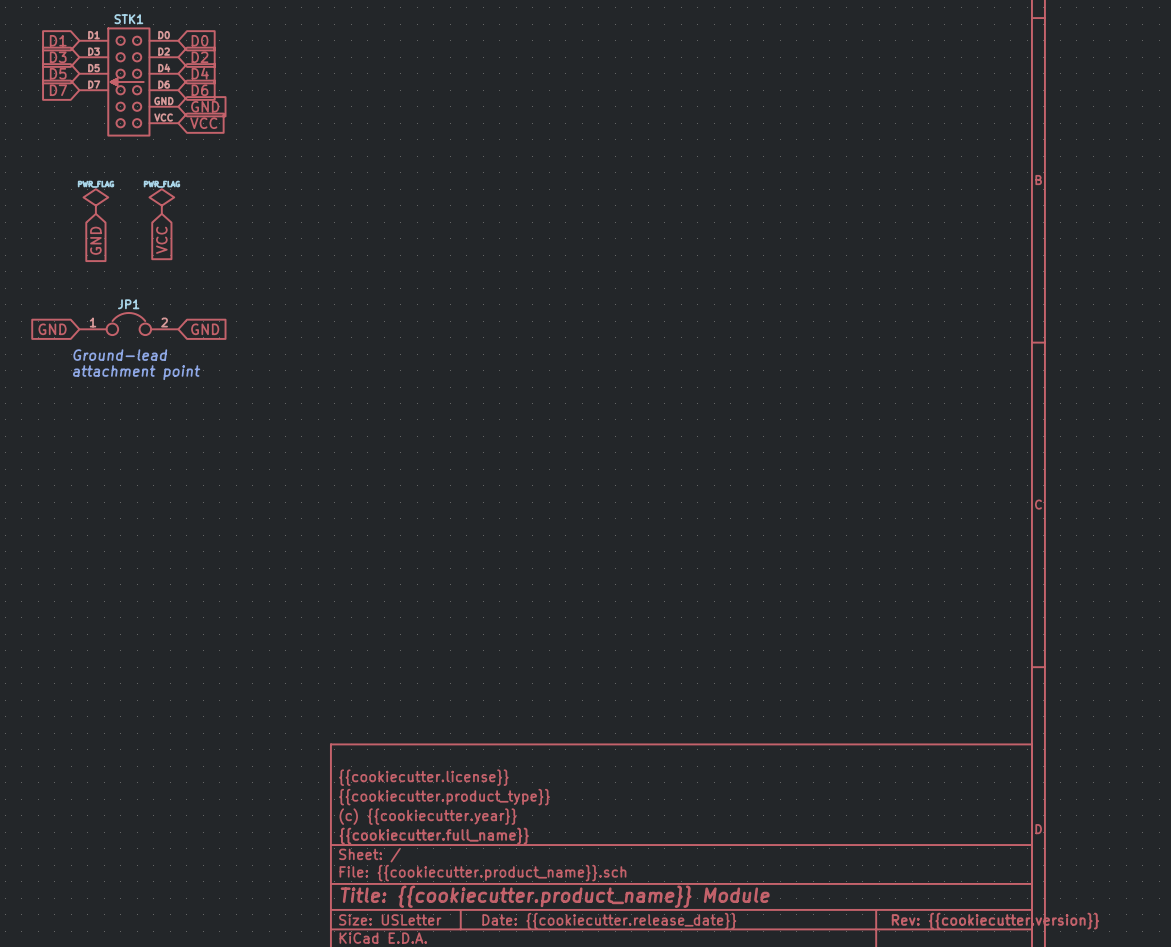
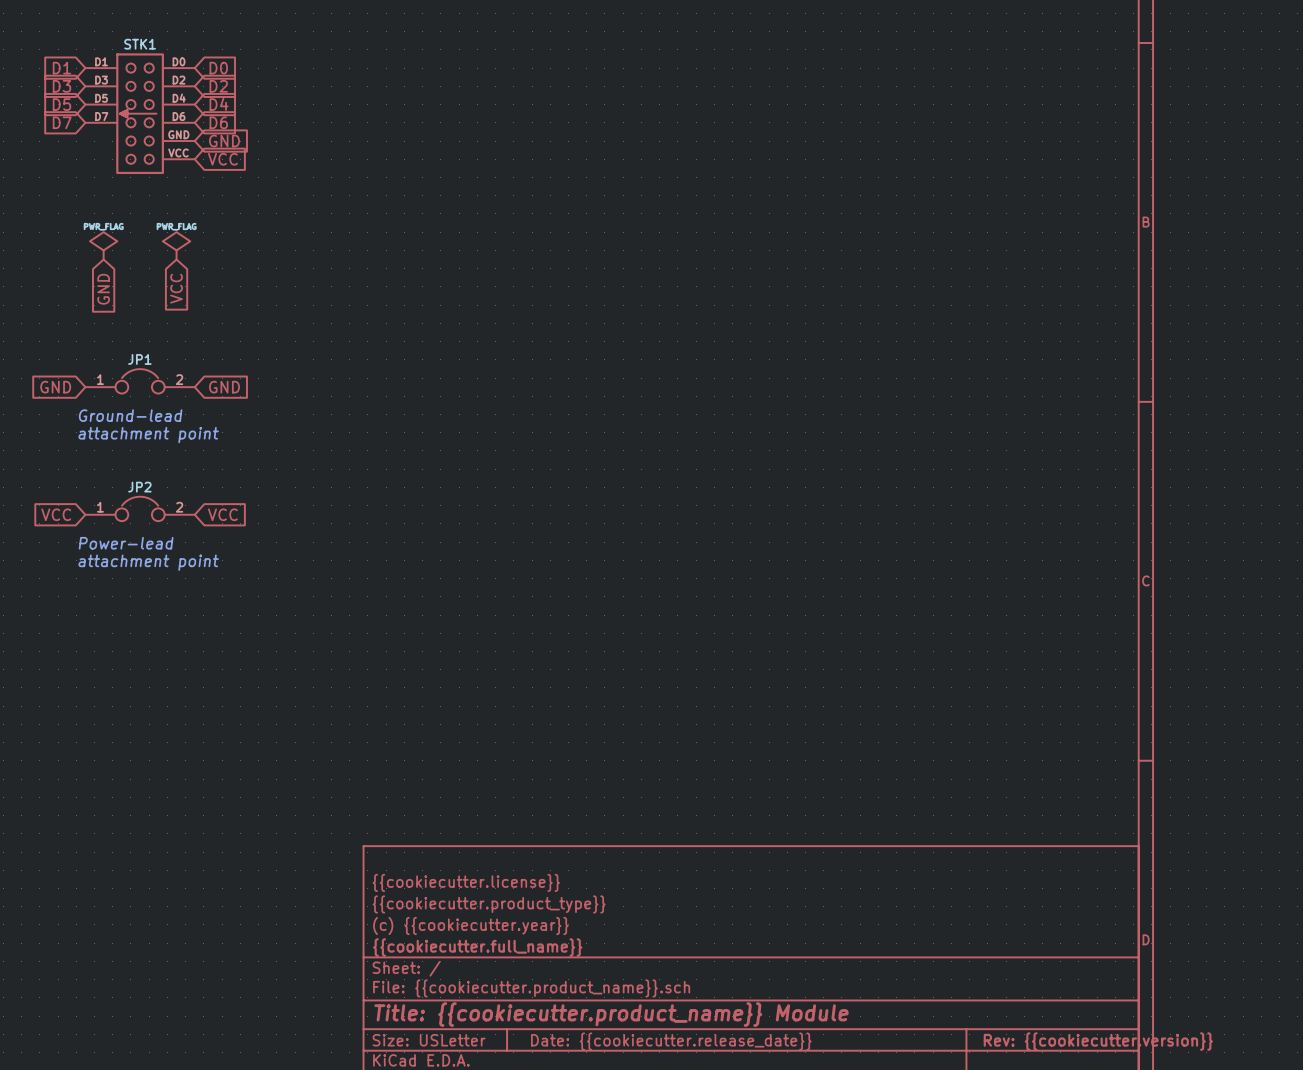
JP2: none -> (140, 508)
global label: none -> VCC (56, 514)
global label: none -> VCC (222, 514)
text: none -> Power-lead (126, 543)
text: none -> attachment point (148, 562)

